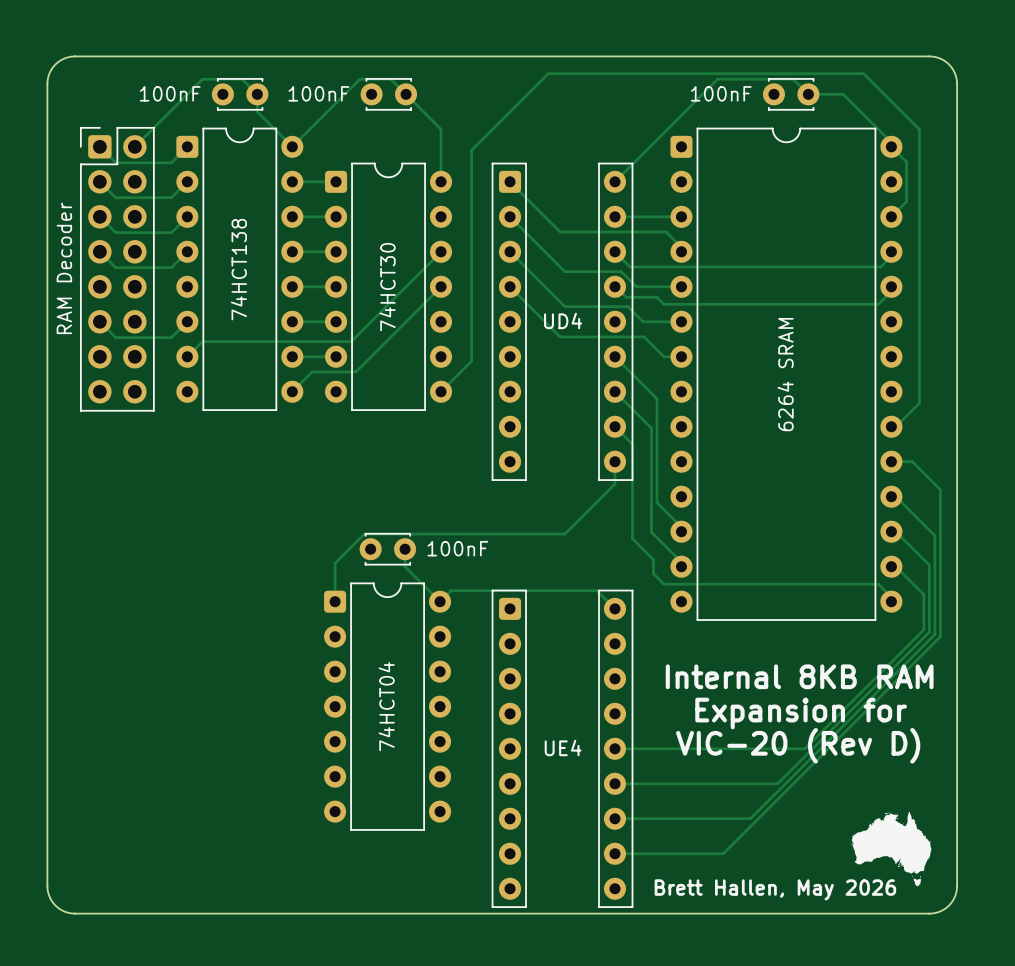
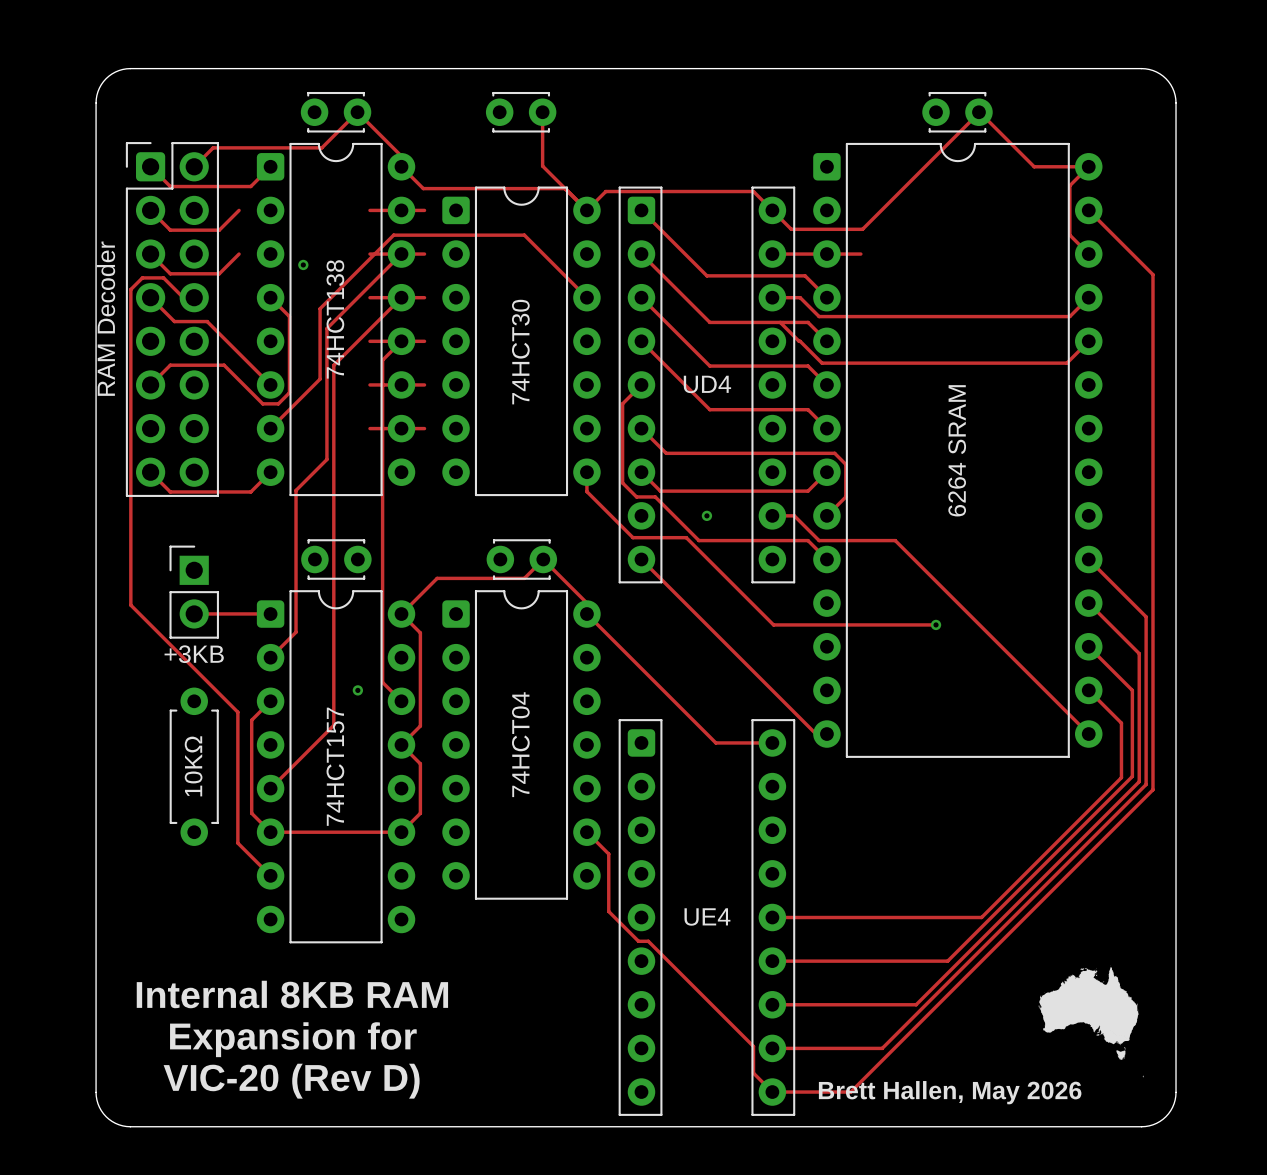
board edge: (74, 56) (929, 56) (941, 59) (949, 64) (955, 74) (957, 83) (957, 886) (955, 895) (949, 905) (938, 912) (929, 913) (74, 913) (63, 910) (55, 905) (48, 895) (47, 886) (47, 83) (48, 74) (55, 64) (63, 59) (74, 56) -> (130, 68) (119, 70) (106, 78) (97, 91) (96, 102) (96, 1092) (99, 1107) (106, 1116) (119, 1124) (130, 1126) (1141, 1126) (1156, 1123) (1165, 1116) (1172, 1107) (1176, 1092) (1176, 102) (1172, 88) (1165, 78) (1153, 70) (1141, 68) (130, 68)
part: 100nF (240, 94) -> none
part: 100nF (388, 94) -> none
part: 100nF (791, 94) -> none
part: none -> (336, 112)
part: none -> (521, 112)
track: none -> (542, 112) (542, 166) (586, 210)
part: none -> (957, 112)
track: (99, 146) (115, 162) (171, 162) (187, 146) -> none
track: none -> (150, 166) (170, 186) (250, 186) (270, 166)
track: (134, 146) (202, 79) (242, 79) (257, 94) (257, 111) (292, 146) (359, 79) (390, 79) (441, 129) (441, 181) -> none
track: none -> (194, 166) (213, 147) (321, 147) (357, 112) (401, 156) (401, 166) (423, 188) (565, 188)
track: (891, 146) (906, 162) (906, 201) (891, 216) -> none
track: (895, 146) (843, 94) (808, 94) (793, 79) (717, 79) (615, 181) -> none
track: (99, 181) (115, 197) (132, 197) -> (150, 210) (170, 230)
track: none -> (586, 210) (605, 191) (753, 191) (791, 229) (862, 229) (979, 112) (1034, 166) (1088, 166) (1069, 185) (1069, 235) (1088, 254)
track: none -> (1088, 210) (1152, 274) (1152, 789) (850, 1092) (772, 1092) (753, 1073) (753, 1046) (648, 941) (638, 941) (608, 911) (608, 854) (586, 832)
track: (99, 216) (115, 232) (132, 232) -> (150, 254) (170, 273)
track: none -> (401, 254) (326, 328) (326, 459) (296, 490) (296, 632) (270, 657)
via: none -> (303, 264)
track: (560, 231) (666, 231) (685, 251) -> (704, 272) (706, 275) (805, 275) (826, 297)
track: (99, 251) (115, 267) (171, 267) (187, 251) -> none
track: none -> (150, 297) (174, 321) (207, 321) (270, 384)
track: none -> (194, 297) (183, 297) (163, 277) (142, 277) (130, 289) (130, 605) (237, 712) (237, 843) (270, 875)
track: none -> (270, 297) (289, 316) (289, 392) (278, 403) (262, 403) (224, 365) (170, 365) (150, 384)
track: none -> (401, 297) (333, 365) (333, 725) (270, 788)
track: (441, 251) (351, 341) (202, 341) (187, 356) -> none
track: none -> (586, 297) (524, 235) (393, 235) (320, 308) (320, 379) (270, 428)
track: (615, 251) (630, 266) (652, 266) -> (772, 297) (800, 297) (819, 316)
track: (895, 251) (880, 266) (853, 266) -> (1088, 297) (1069, 316)
part position: (117, 269) -> (172, 319)
part position: (239, 269) -> (336, 319)
track: none -> (780, 322) (808, 322) (826, 341)
track: none -> (401, 341) (382, 360) (382, 682) (401, 701)
part position: (388, 286) -> (521, 341)
track: (441, 286) (355, 371) (312, 371) (292, 391) -> none
track: (615, 286) (626, 297) (656, 297) (663, 304) -> (800, 341) (822, 363) (833, 363)
track: (637, 286) (685, 286) -> none
track: (895, 286) (878, 304) (851, 304) -> (1088, 341) (1066, 363)
part value position: 74HCT30 (387, 287) -> 74HCT30 (520, 352)
track: (627, 306) (642, 321) (685, 321) -> (788, 366) (808, 366) (826, 384)
track: (99, 321) (115, 337) (171, 337) (187, 321) -> none
track: none -> (641, 384) (622, 403) (622, 482) (636, 496) (655, 496) (698, 540) (808, 540) (826, 559)
track: (560, 336) (644, 336) (663, 356) (685, 356) -> (704, 403) (709, 409) (808, 409) (826, 428)
track: none -> (641, 428) (666, 453) (834, 453) (845, 464) (845, 496) (826, 515)
track: (615, 356) (656, 398) (656, 502) (685, 531) -> none
part position: (786, 374) -> (957, 450)
track: none -> (150, 472) (170, 491) (250, 491) (270, 472)
track: (441, 391) (471, 361) (471, 150) (548, 73) (863, 73) (919, 129) (919, 403) (895, 426) -> none
track: none -> (586, 472) (586, 491) (632, 537) (686, 537) (773, 624) (936, 624)
track: none -> (641, 472) (660, 491) (808, 491) (826, 472)
track: (615, 391) (651, 428) (651, 532) (685, 566) -> none
via: none -> (706, 515)
track: (615, 426) (632, 444) (632, 538) (653, 559) (653, 573) (663, 584) (878, 584) (895, 601) -> (772, 515) (794, 515) (819, 540) (895, 540) (1088, 734)
part: none -> (336, 559)
part: none -> (521, 559)
track: none -> (641, 559) (816, 734) (826, 734)
track: (615, 461) (615, 483) (564, 534) (364, 534) (335, 563) (335, 601) -> none
track: (895, 461) (912, 461) (940, 489) (940, 636) (723, 853) (703, 853) -> (1088, 559) (1146, 616) (1146, 784) (882, 1048)
part: none -> +3KB (194, 592)
track: (895, 496) (934, 535) (934, 634) (750, 818) (615, 818) -> (1088, 603) (1139, 653) (1139, 781) (916, 1004) (772, 1004)
track: none -> (194, 613) (270, 613)
via: none -> (936, 624)
track: (895, 531) (929, 565) (929, 632) (777, 783) (755, 783) -> (1088, 646) (1132, 690) (1132, 776) (947, 961)
part: 100nF (387, 549) -> none
track: (405, 549) (405, 566) (440, 601) (451, 590) (596, 590) (615, 608) -> (270, 701) (251, 720) (251, 813) (270, 832) (401, 832) (420, 813) (420, 763) (401, 744) (420, 726) (420, 632) (401, 614) (437, 578) (524, 578) (543, 559) (586, 603) (586, 614) (715, 742) (772, 742)
via: none -> (357, 690)
track: (895, 566) (923, 594) (923, 629) (804, 748) (782, 748) -> (1088, 690) (1121, 723) (1121, 777) (981, 917)
part: none -> 10KΩ (194, 766)
part: none -> 74HCT157 (336, 766)
text: Internal 8KB RAM (799, 676) -> none
part position: (387, 706) -> (521, 744)
text: Expansion for (801, 713) -> none
text: VIC-20 (Rev D) (798, 745) -> none
text: none -> Internal 8KB RAM (292, 994)
drawing position: (886, 813) -> (1082, 969)
drawing position: (897, 818) -> (1096, 975)
drawing position: (891, 828) -> (1088, 987)
drawing position: (915, 831) -> (1119, 991)
drawing position: (867, 841) -> (1058, 1003)
text: none -> Expansion for (293, 1039)
drawing position: (894, 857) -> (1092, 1024)
drawing position: (918, 859) -> (1122, 1026)
drawing position: (922, 865) -> (1127, 1034)
drawing position: (899, 866) -> (1098, 1034)
drawing position: (915, 868) -> (1118, 1037)
drawing position: (920, 876) -> (1124, 1047)
text: none -> VIC-20 (Rev D) (291, 1081)
drawing position: (917, 882) -> (1120, 1055)

